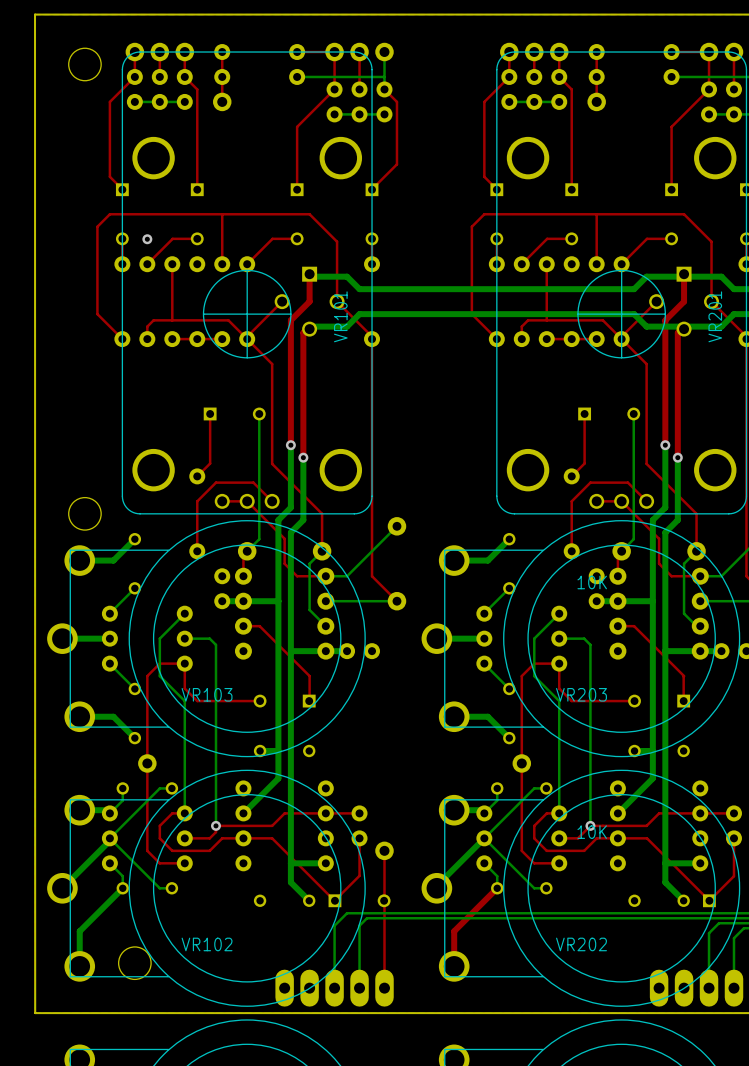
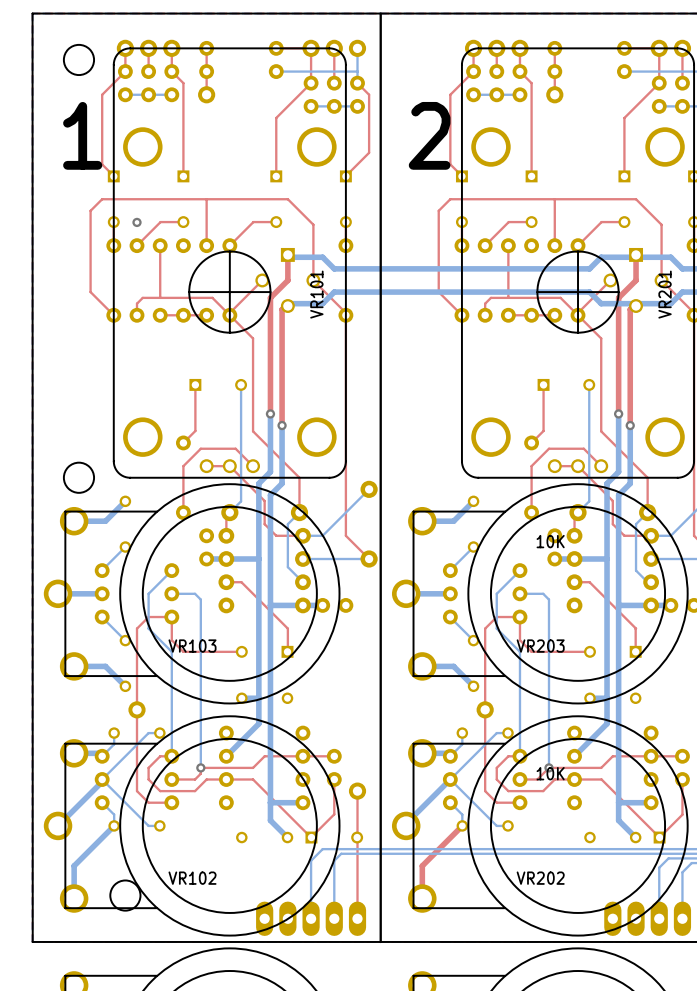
line: none -> (380, 13) (380, 941)
text: none -> 1 (82, 135)
text: none -> 2 (429, 135)

